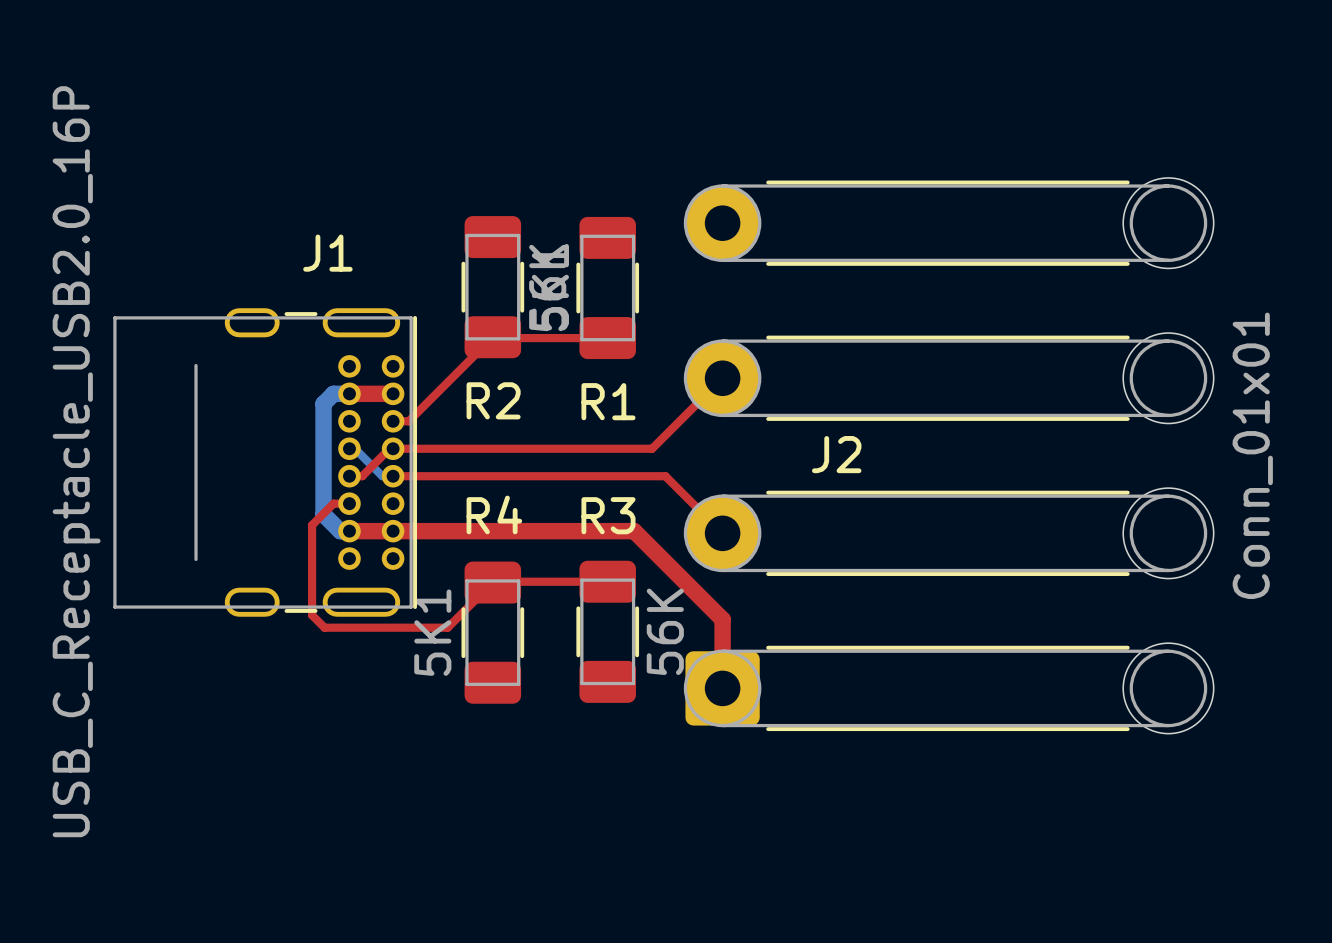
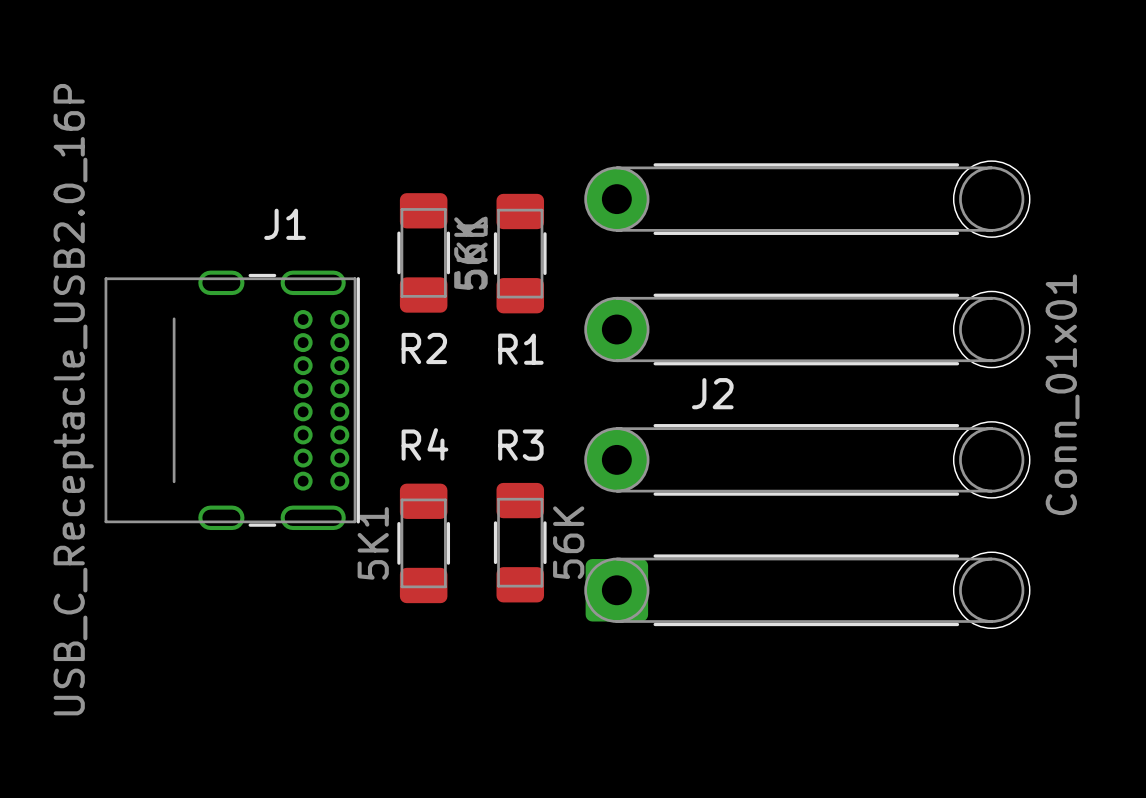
top track: (607, 338) (492, 337) (408, 421) (393, 421) -> none
top track: (722, 378) (652, 448) (389, 448) (362, 476) (349, 476) -> none
top track: (349, 393) (393, 393) -> none
bottom track: (349, 393) (333, 393) (323, 403) (323, 514) (340, 531) (349, 531) -> none
bottom track: (349, 448) (354, 448) (382, 476) (393, 476) -> none
top track: (393, 476) (665, 476) (722, 533) -> none
top track: (349, 503) (333, 503) (312, 525) (312, 615) (324, 627) (447, 627) (492, 582) (607, 581) -> none
top track: (349, 531) (634, 531) (722, 619) (722, 688) -> none

